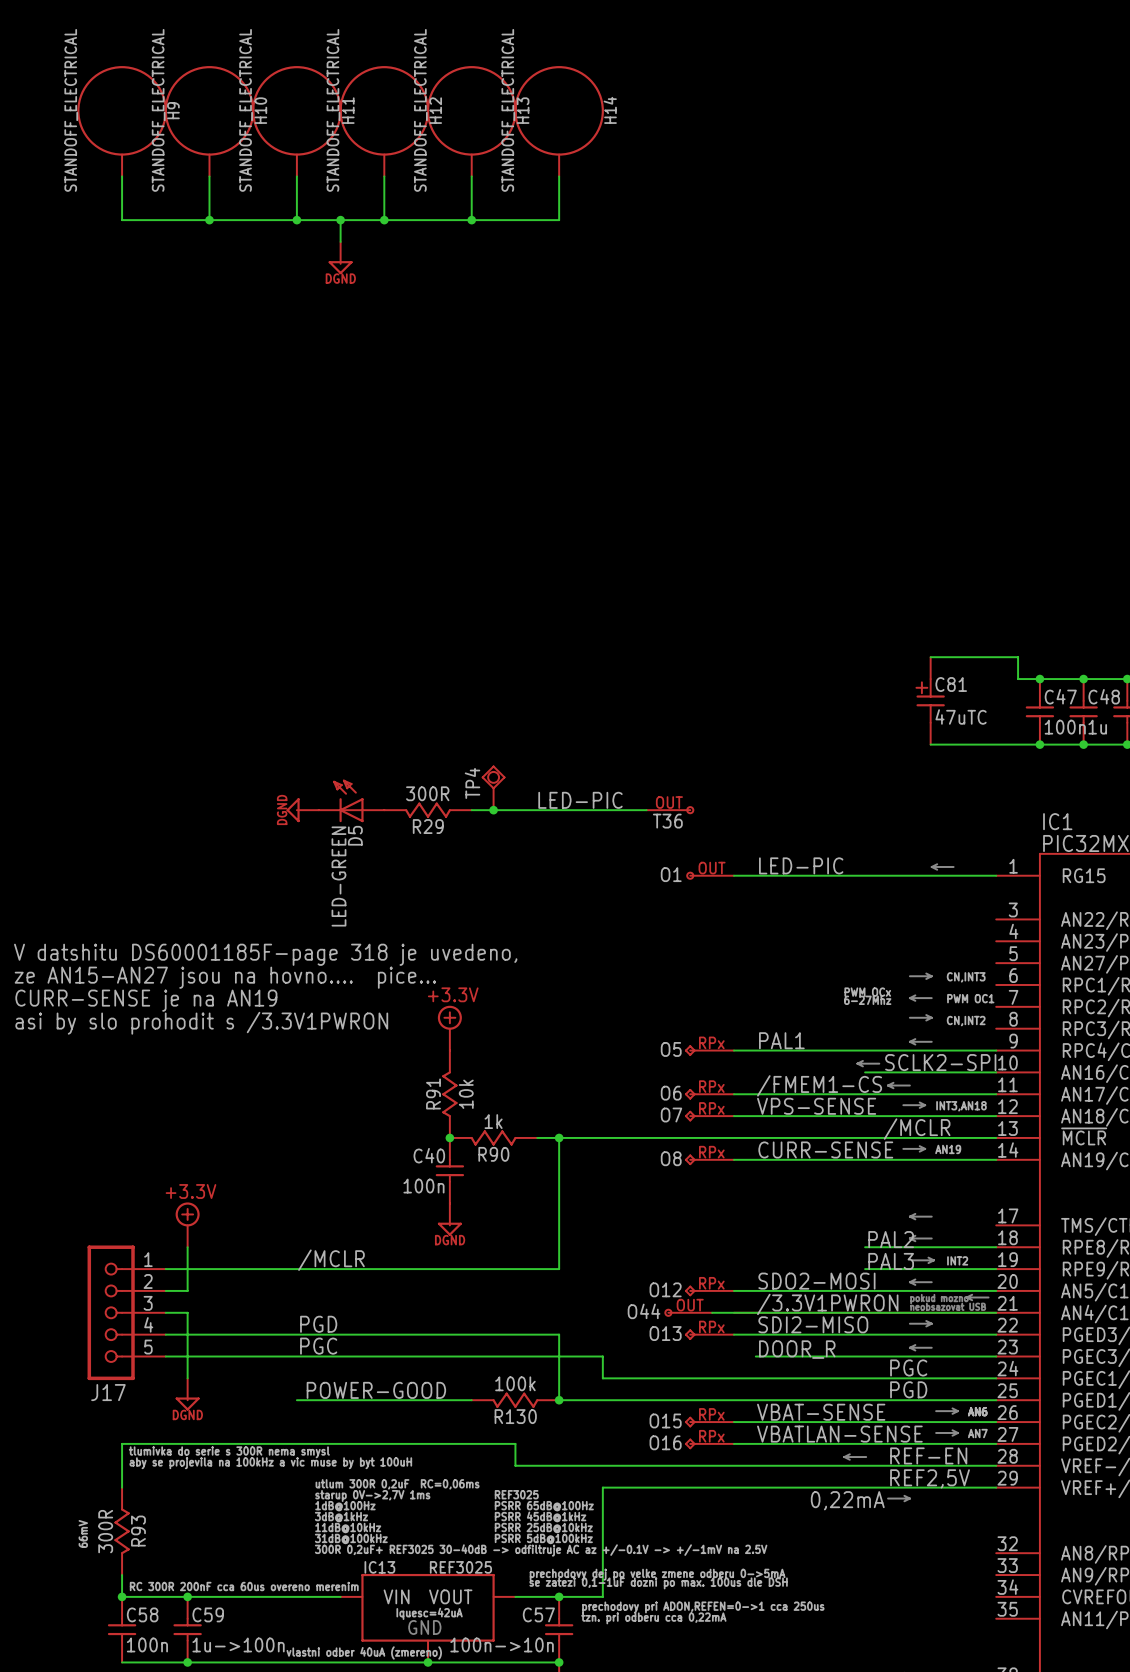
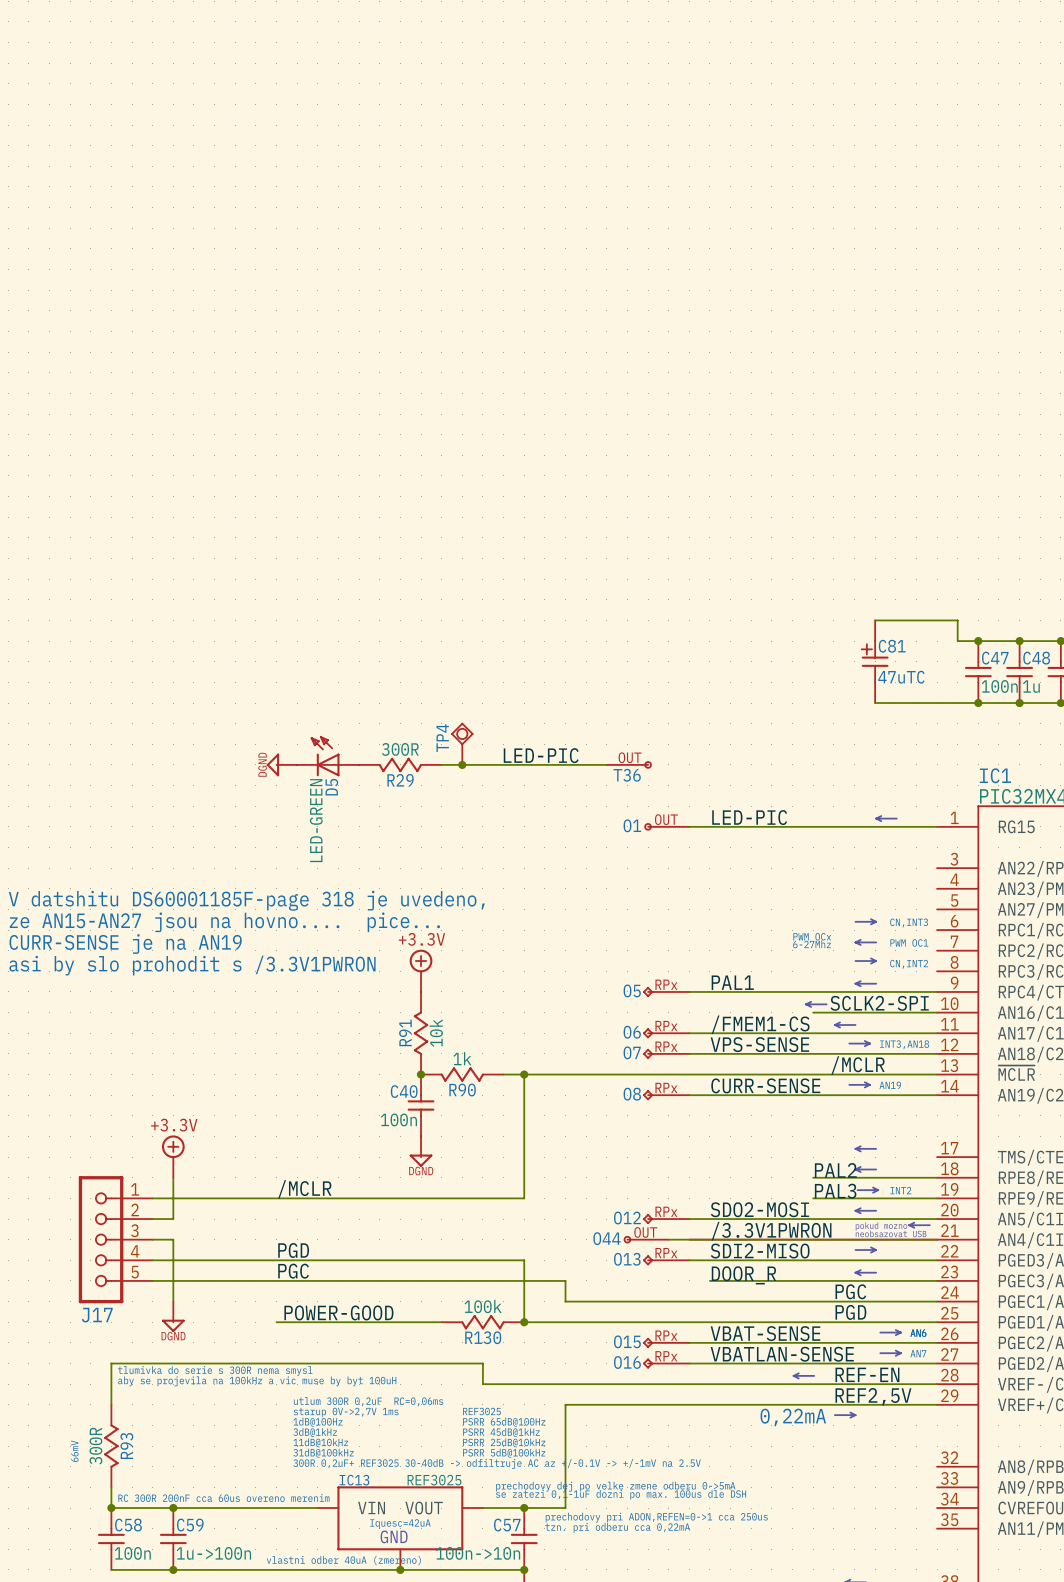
H9: STANDOFF_ELECTRICAL (122, 121) -> none
H10: STANDOFF_ELECTRICAL (209, 121) -> none
H11: STANDOFF_ELECTRICAL (296, 121) -> none
H12: STANDOFF_ELECTRICAL (384, 121) -> none
H13: STANDOFF_ELECTRICAL (471, 121) -> none
H14: STANDOFF_ELECTRICAL (559, 121) -> none
wire: (122, 176) (122, 220) (559, 220) (559, 176) -> none
wire: (209, 176) (209, 220) -> none
wire: (296, 176) (296, 220) -> none
wire: (384, 176) (384, 220) -> none
wire: (471, 176) (471, 220) -> none
junction: (209, 220) -> none
junction: (296, 220) -> none
wire: (340, 220) (340, 241) -> none
junction: (340, 220) -> none
junction: (384, 220) -> none
junction: (471, 220) -> none
power symbol: (340, 258) -> none

